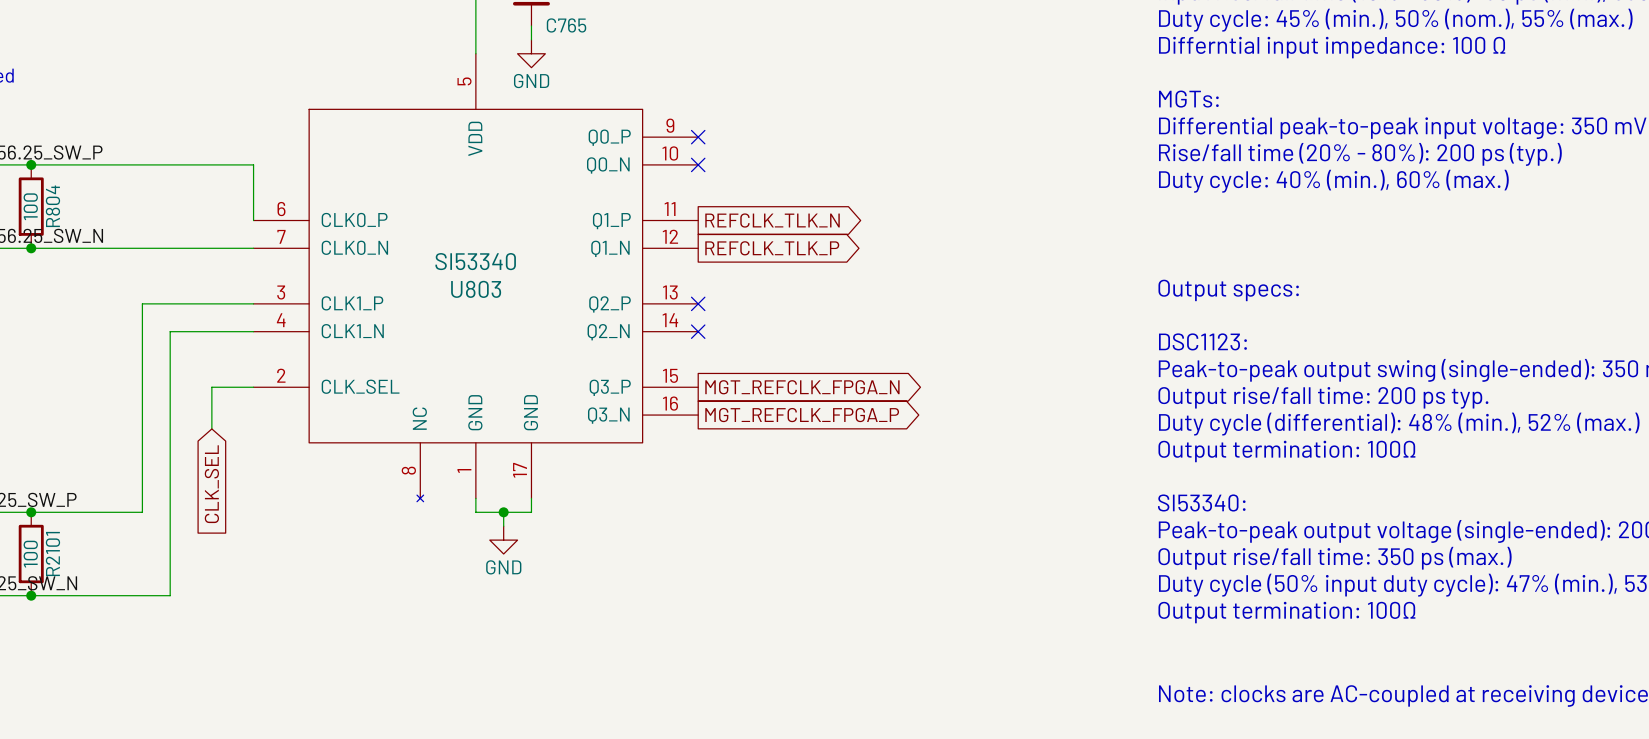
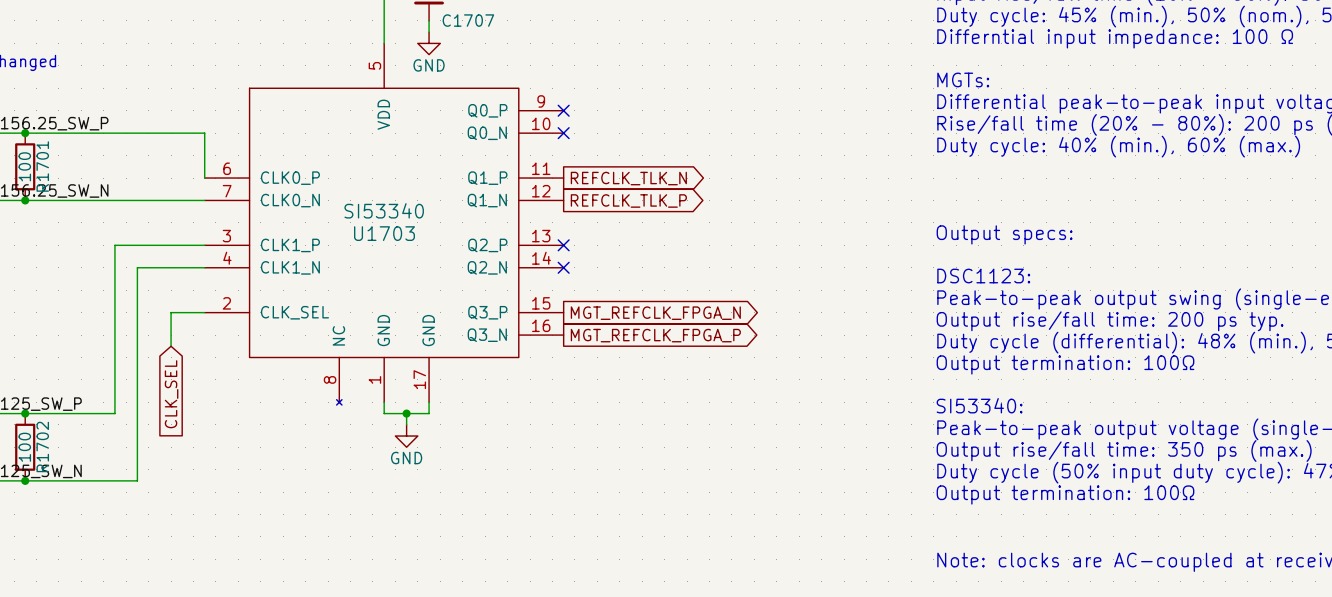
C765 name: C765 (566, 25) -> C1707 (468, 20)
R804 name: R804 (52, 206) -> R1701 (42, 166)
U803 name: U803 (476, 289) -> U1703 (384, 233)
R2101 name: R2101 (52, 553) -> R1702 (42, 446)

